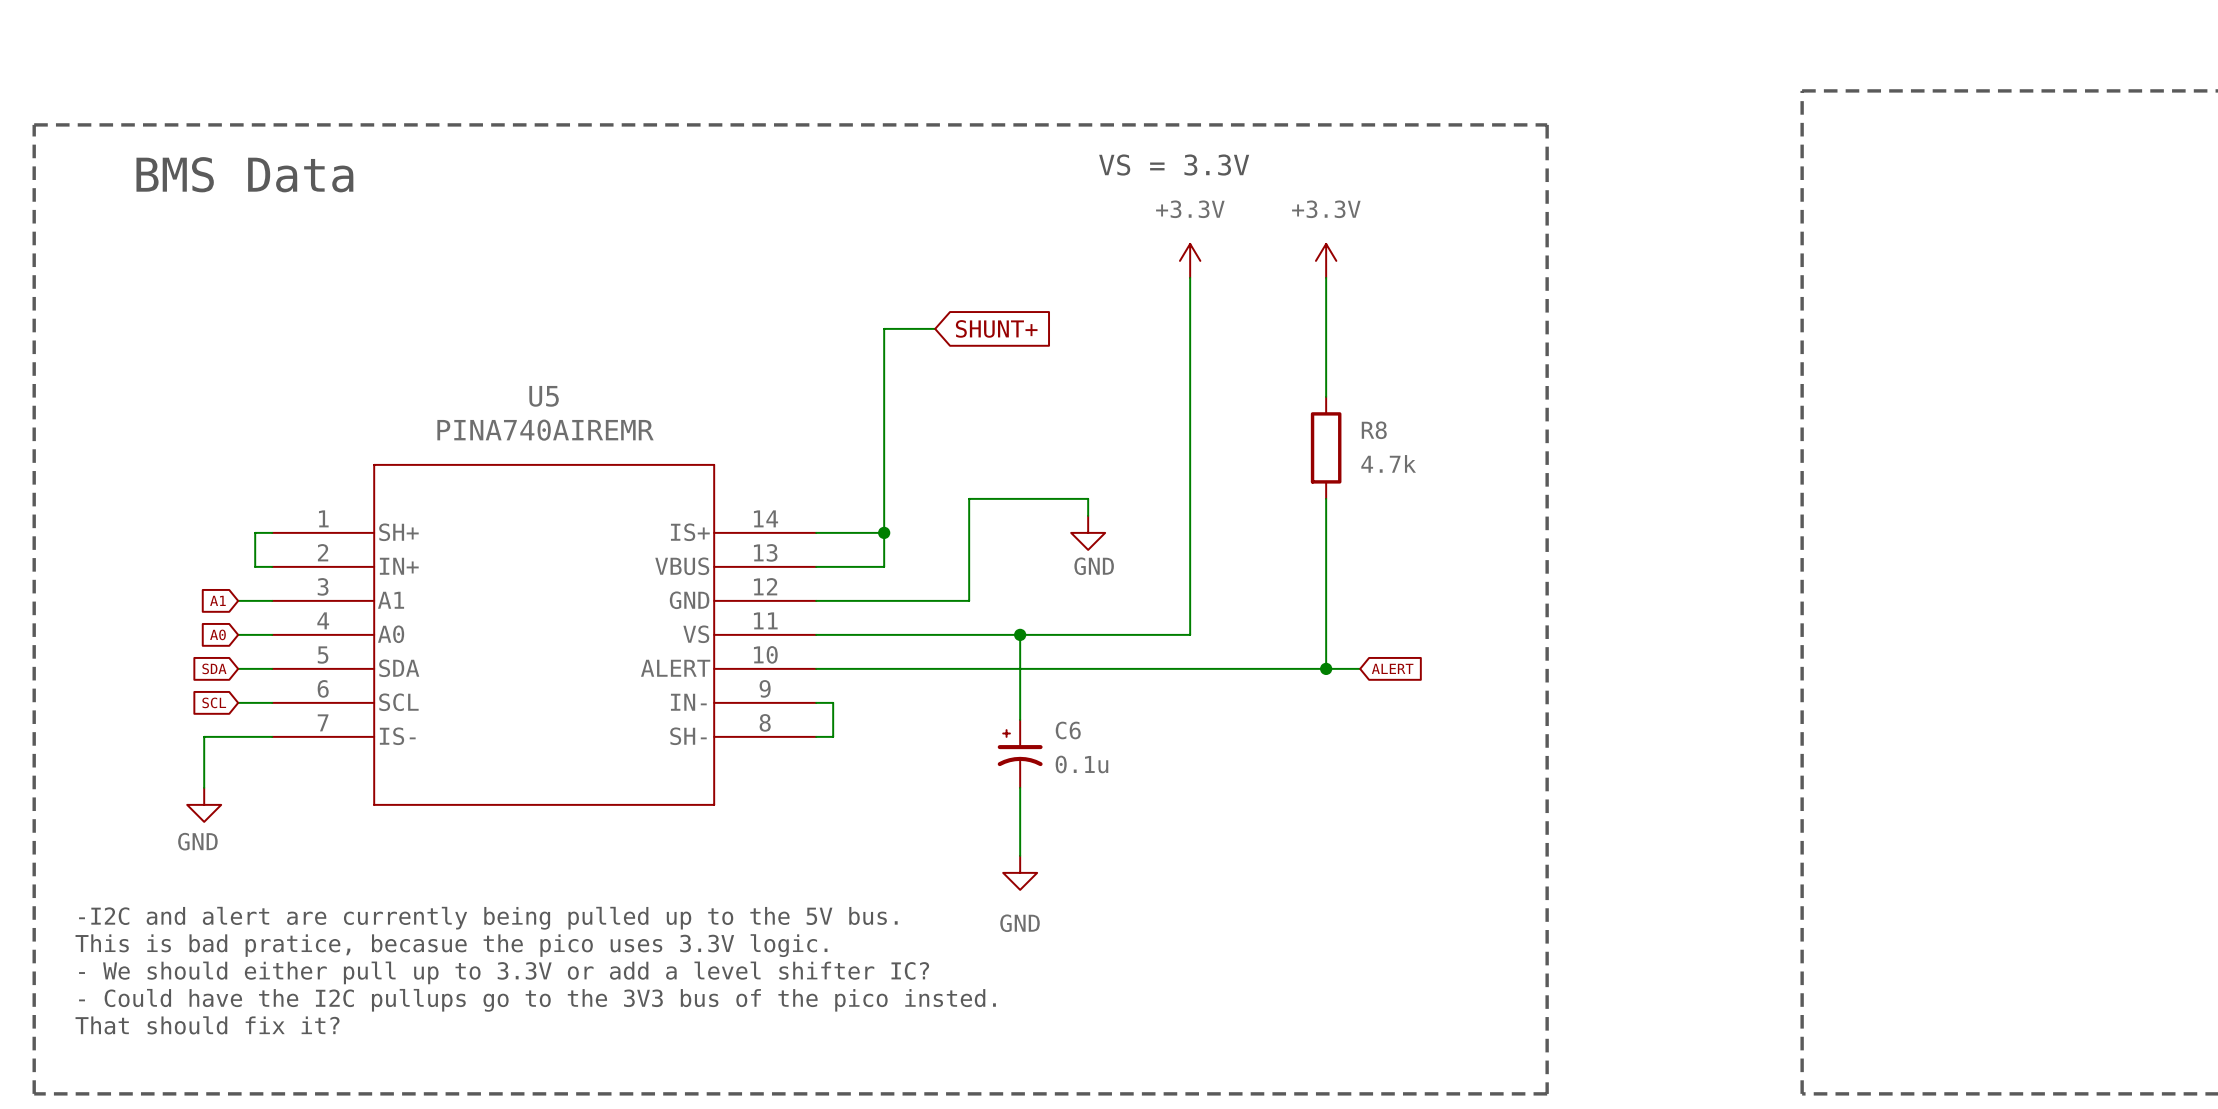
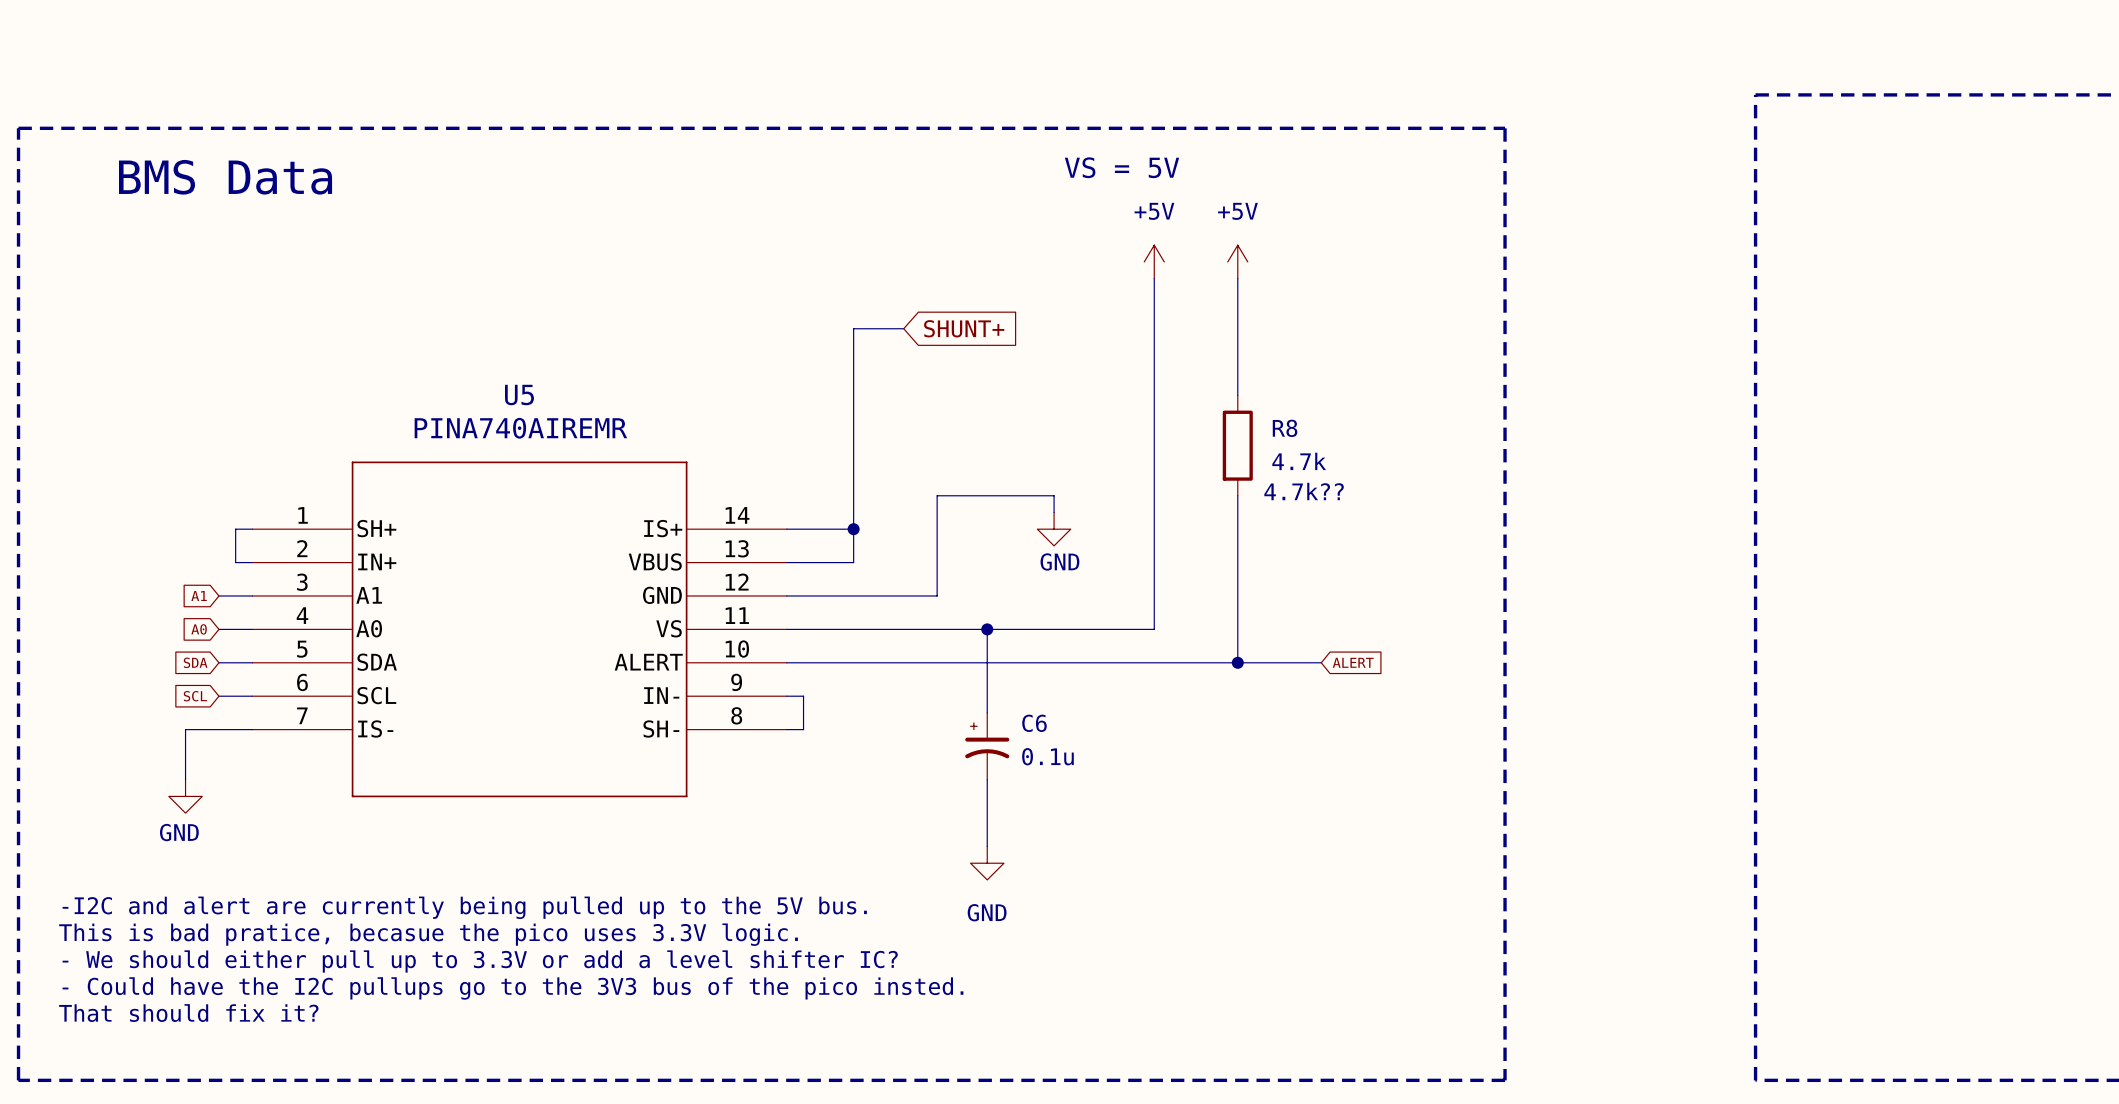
text: VS = 3.3V (1174, 165) -> VS = 5V (1122, 167)
power symbol: +3.3V (1190, 260) -> +5V (1154, 261)
power symbol: none -> +5V (1237, 261)
power symbol: +3.3V (1326, 260) -> none
wire: (1326, 277) (1326, 396) -> (1237, 278) (1237, 395)
R8 position: (1326, 447) -> (1237, 445)
text: none -> 4.7k?? (1304, 491)
wire: (1326, 498) (1326, 668) -> (1237, 495) (1237, 662)
junction position: (1326, 668) -> (1237, 662)

